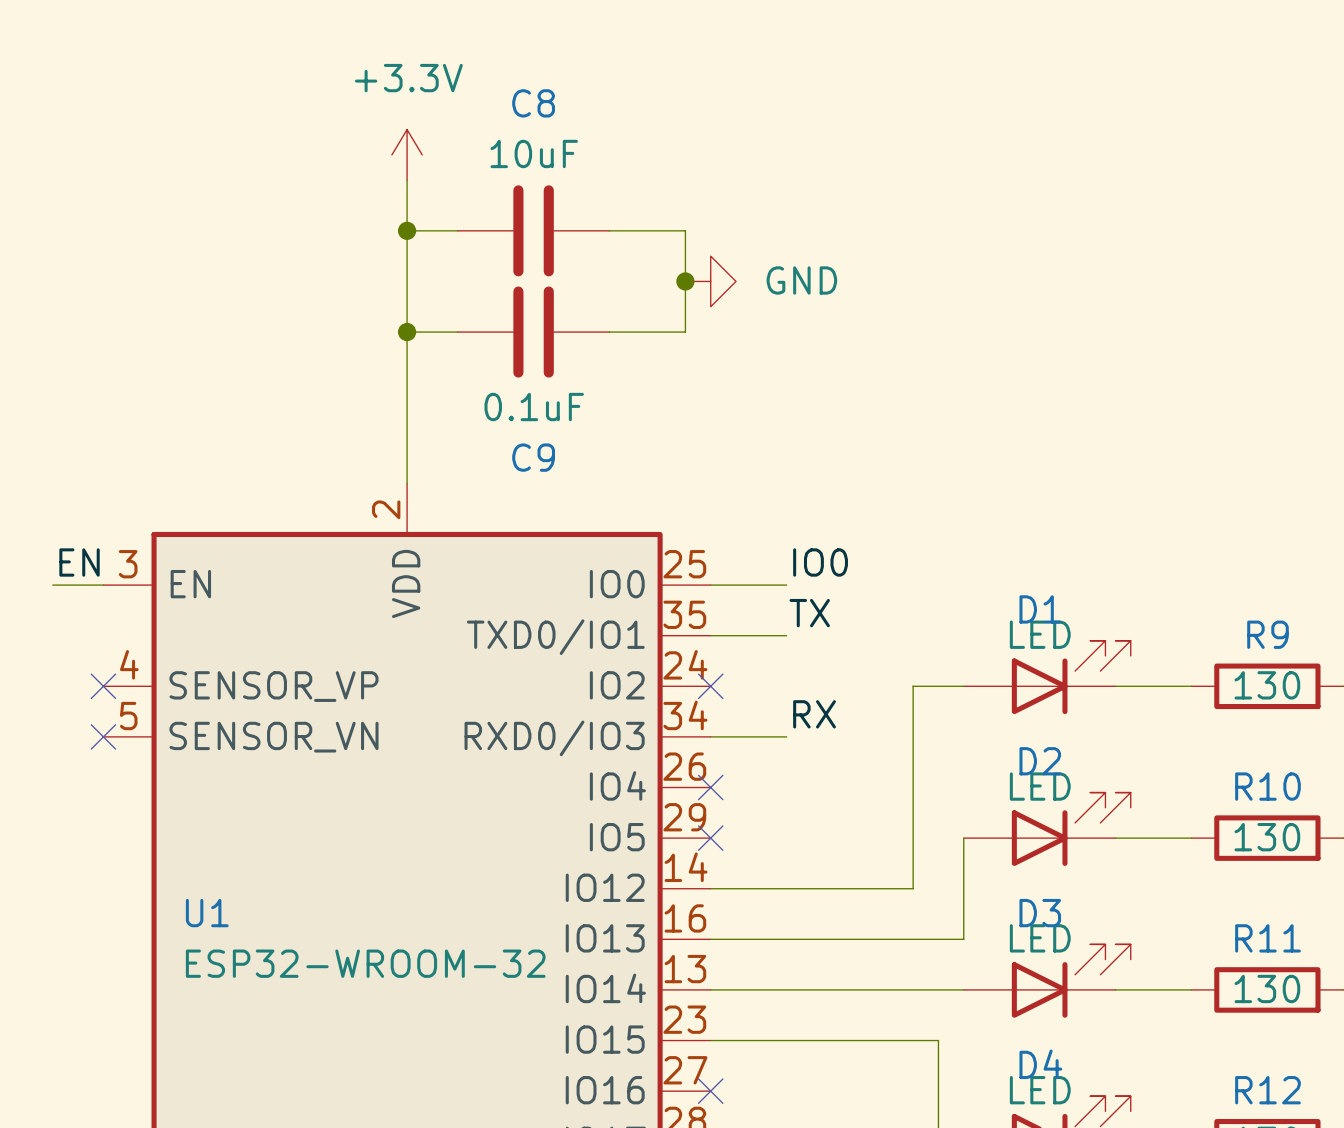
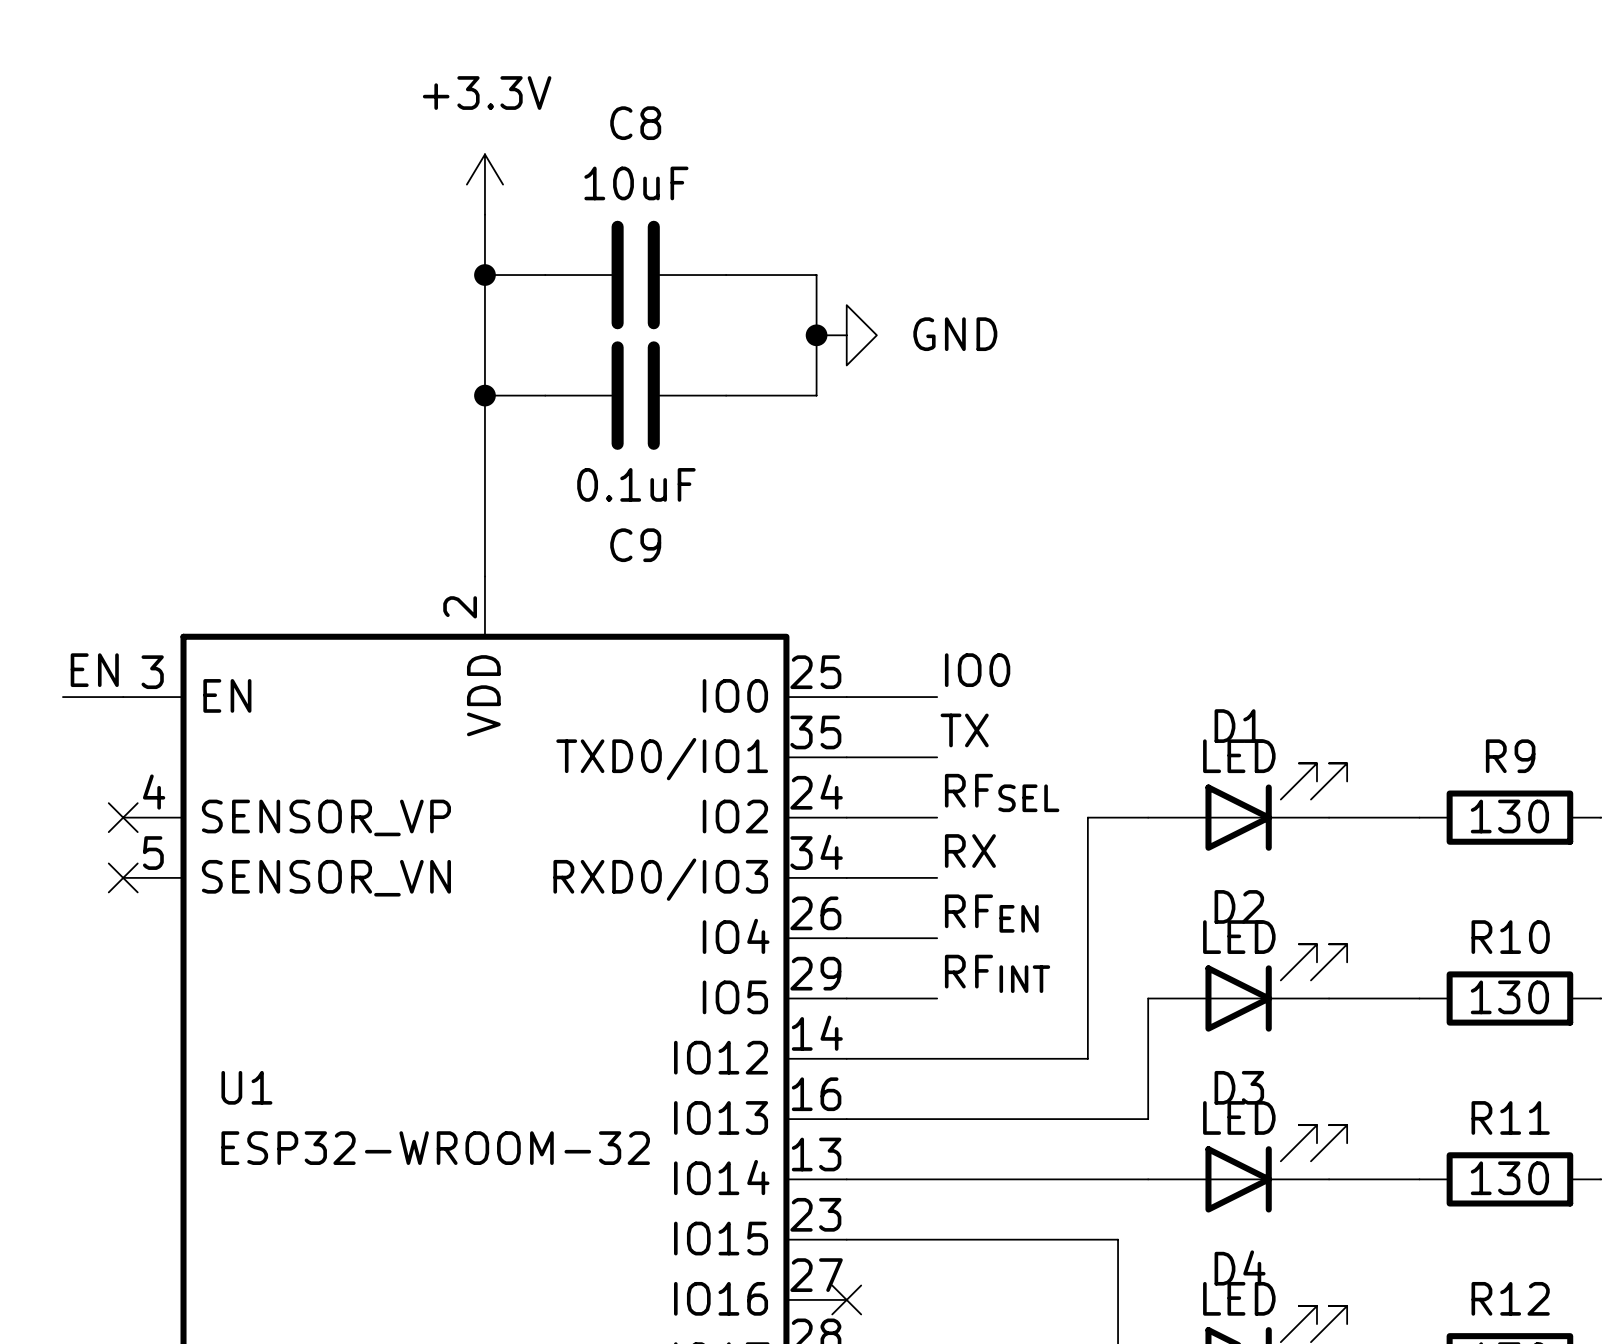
label: none -> RFSEL (1002, 792)
wire: none -> (846, 817) (937, 817)
no-connect mark: (710, 686) -> none
label: none -> RFEN (991, 913)
wire: none -> (846, 938) (937, 938)
no-connect mark: (710, 787) -> none
label: none -> RFINT (997, 973)
wire: none -> (846, 998) (937, 998)
no-connect mark: (710, 838) -> none

